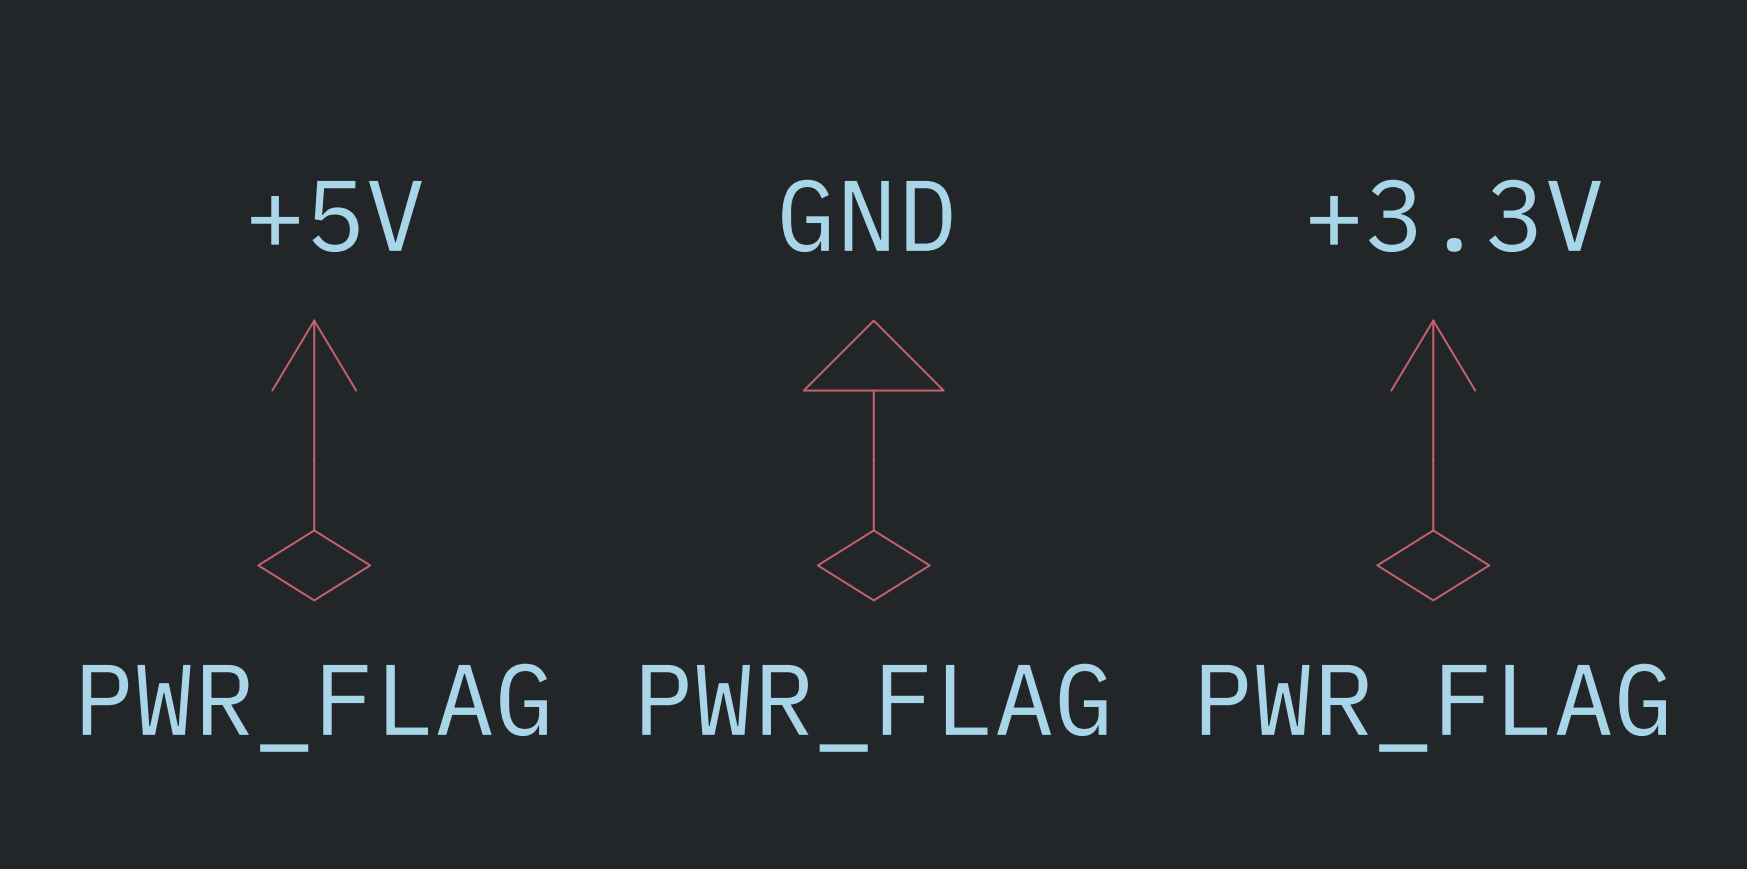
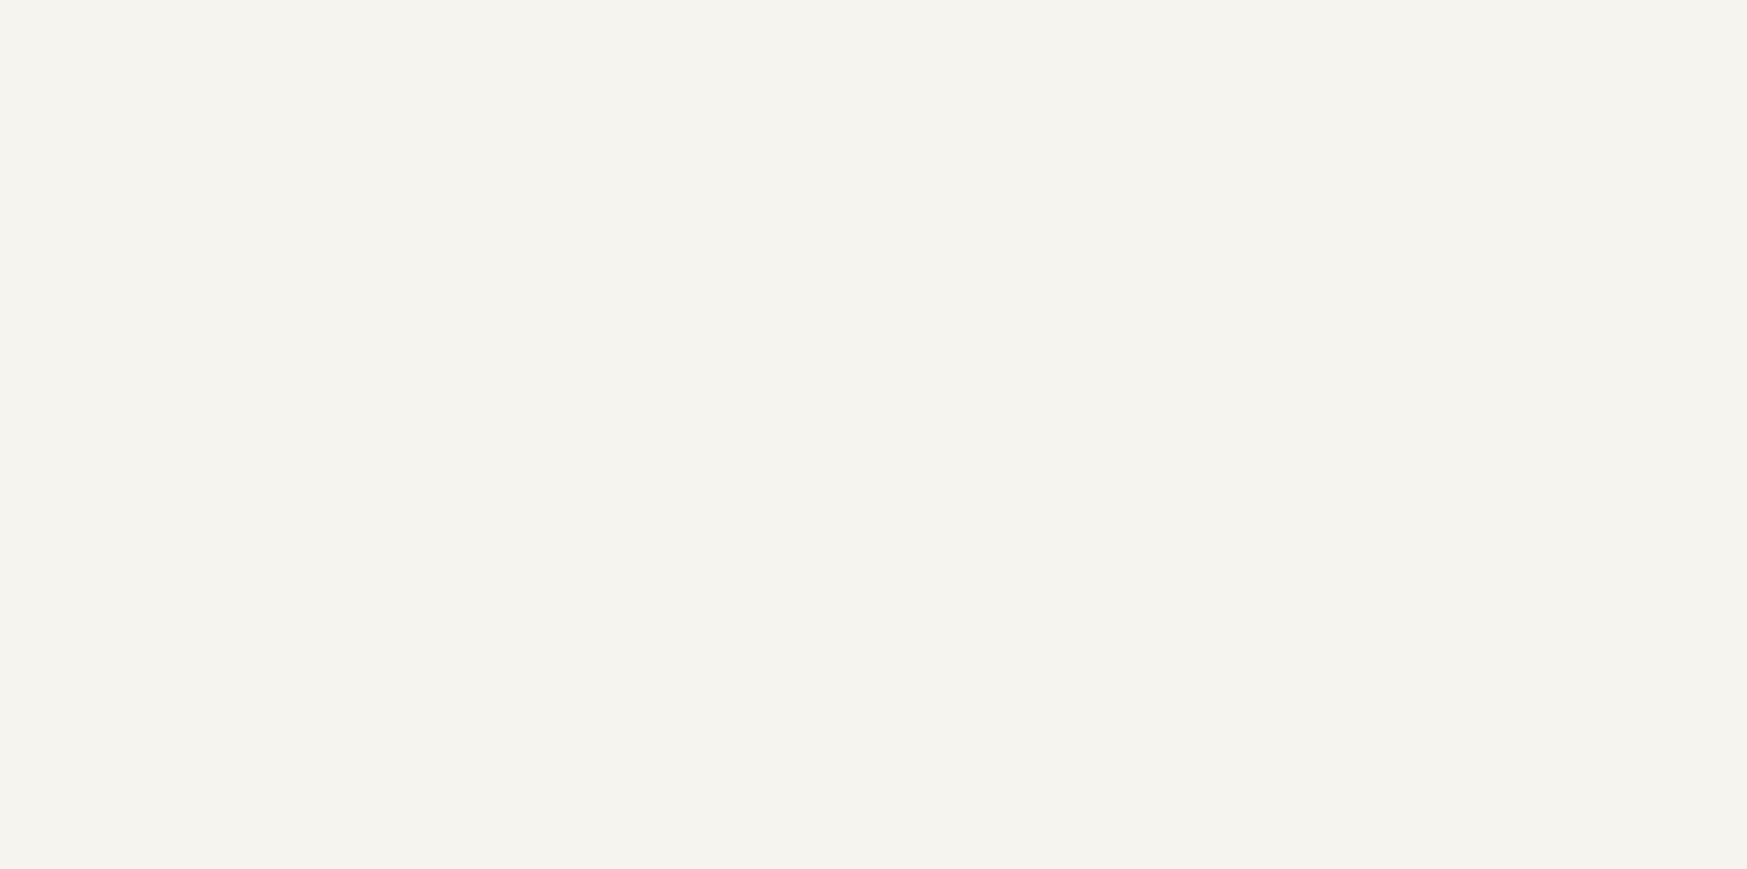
power symbol: +5V (314, 390) -> none
power symbol: GND (873, 390) -> none
power symbol: +3.3V (1433, 390) -> none
power symbol: PWR_FLAG (314, 530) -> none
power symbol: PWR_FLAG (873, 530) -> none
power symbol: PWR_FLAG (1433, 530) -> none

